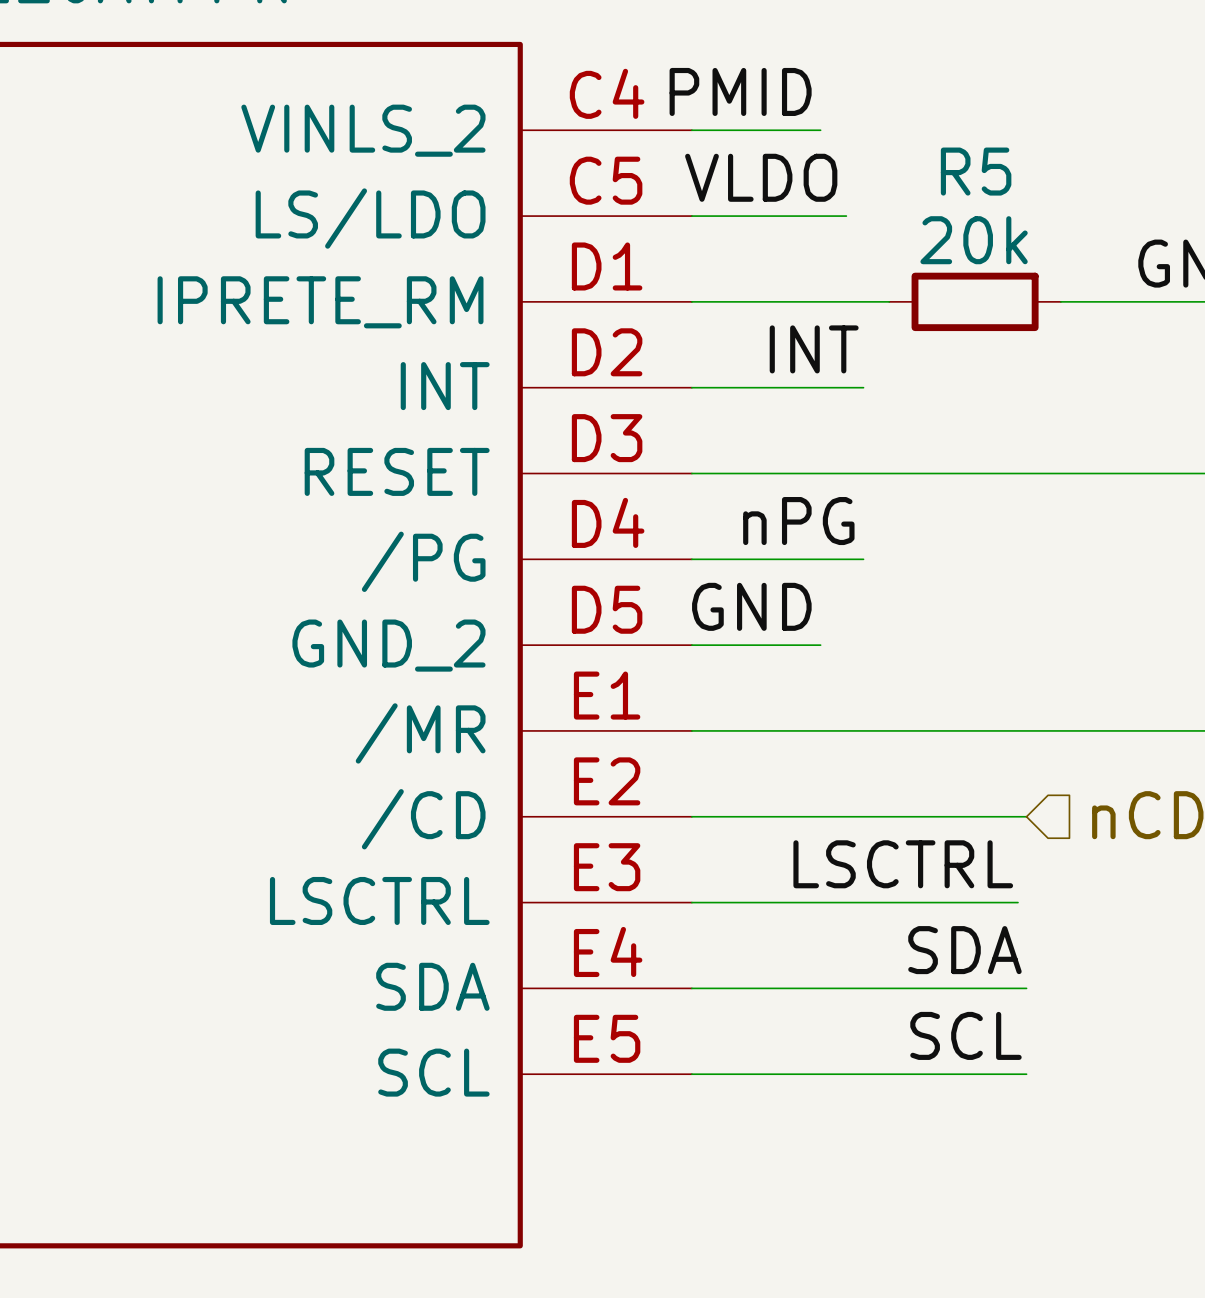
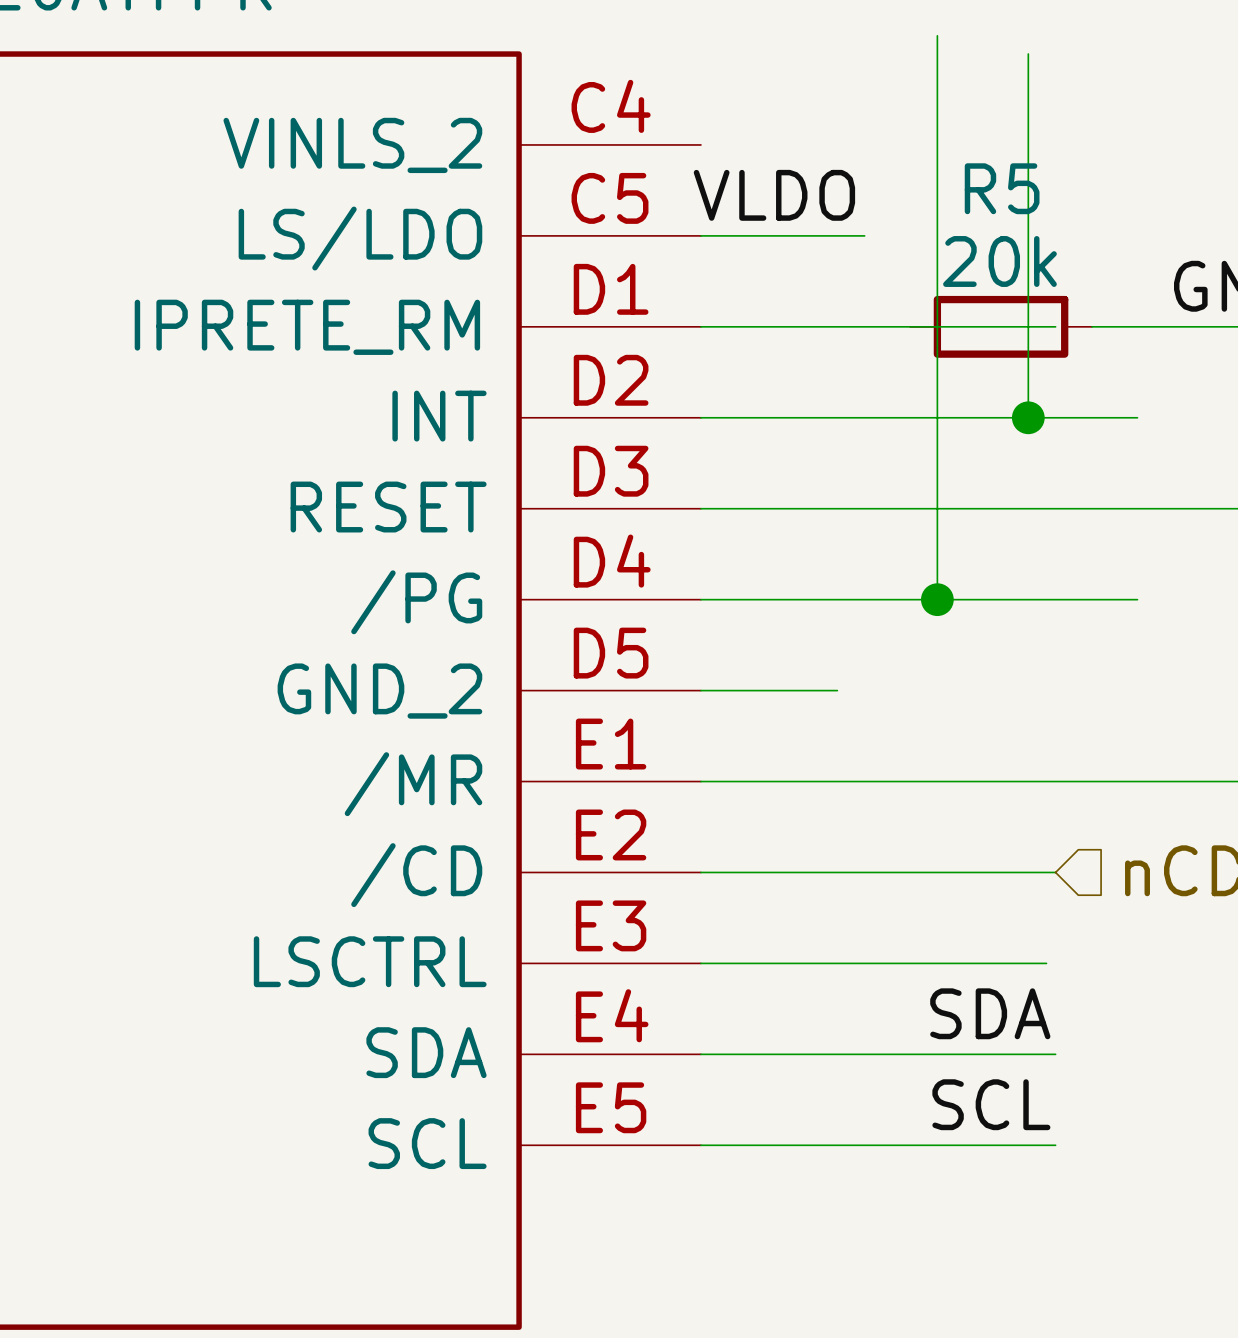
wire: none -> (937, 35) (937, 599)
wire: none -> (1028, 54) (1028, 417)
label: PMID (740, 91) -> none
wire: (691, 130) (820, 130) -> none
wire: none -> (910, 326) (1055, 326)
label: INT (814, 349) -> none
wire: none -> (882, 417) (1137, 417)
junction: none -> (1028, 417)
label: nPG (798, 521) -> none
wire: none -> (882, 599) (1137, 599)
junction: none -> (937, 599)
label: GND (751, 606) -> none
label: LSCTRL (903, 864) -> none

